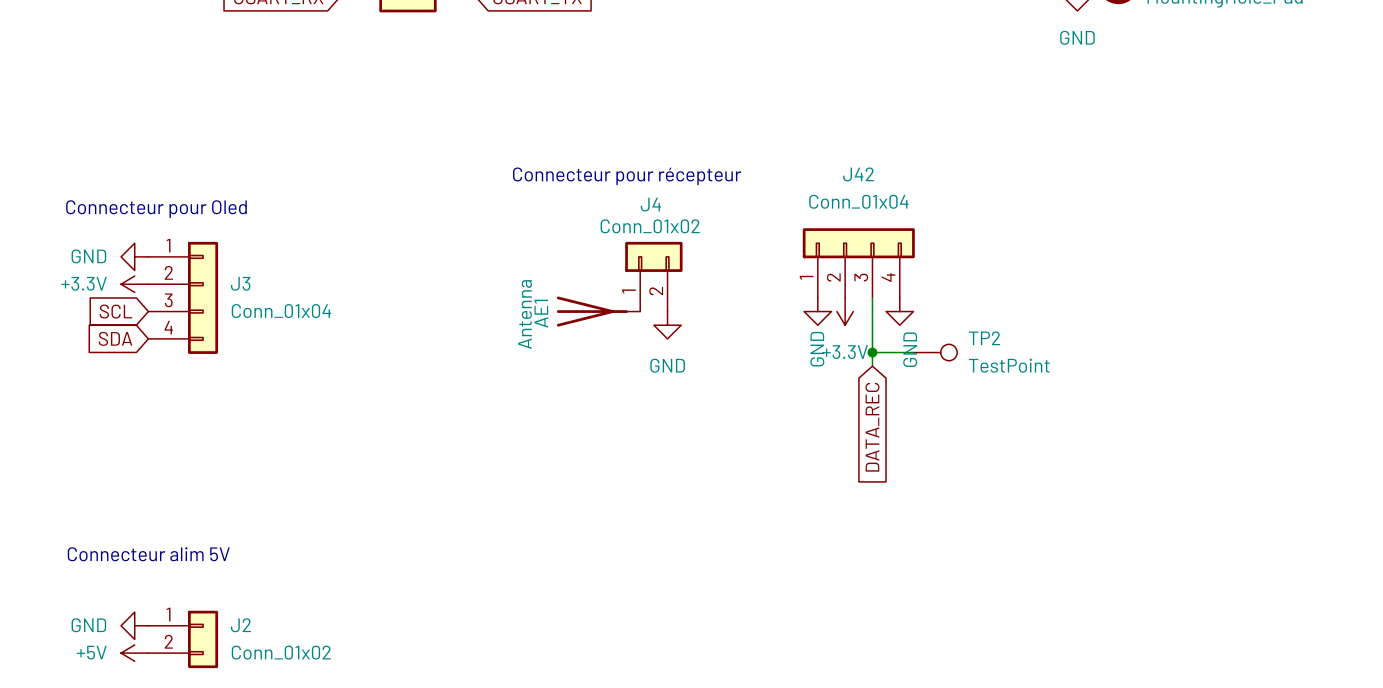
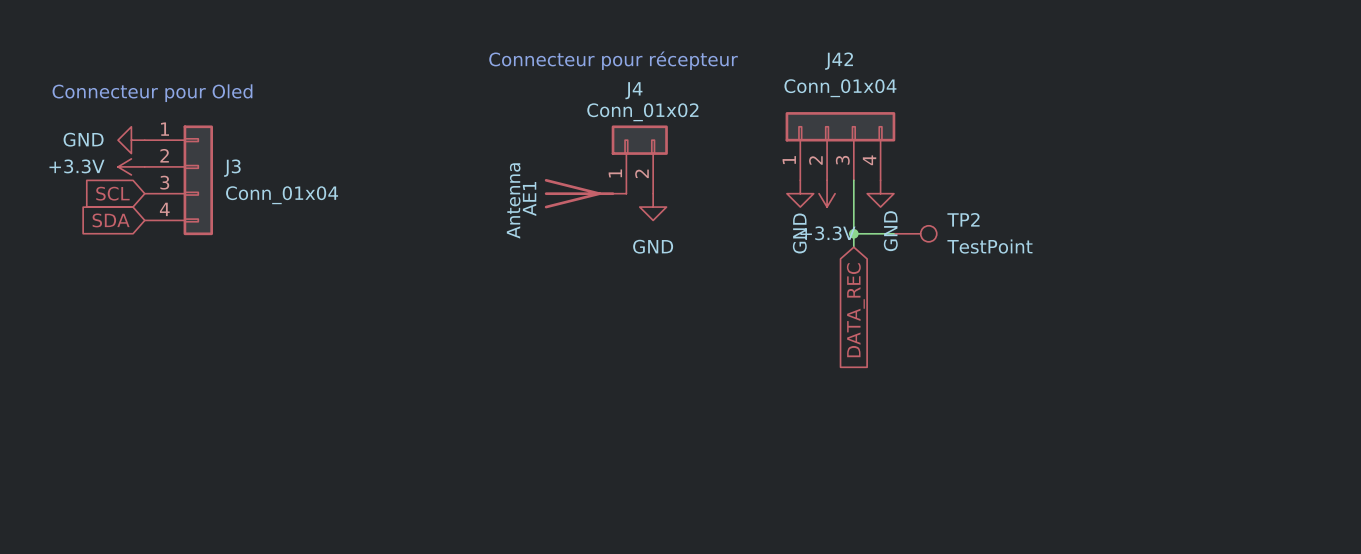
text: Connecteur alim 5V (148, 554) -> none
power symbol: GND (134, 625) -> none
J2: Conn_01x02 (183, 639) -> none
power symbol: +5V (134, 653) -> none

